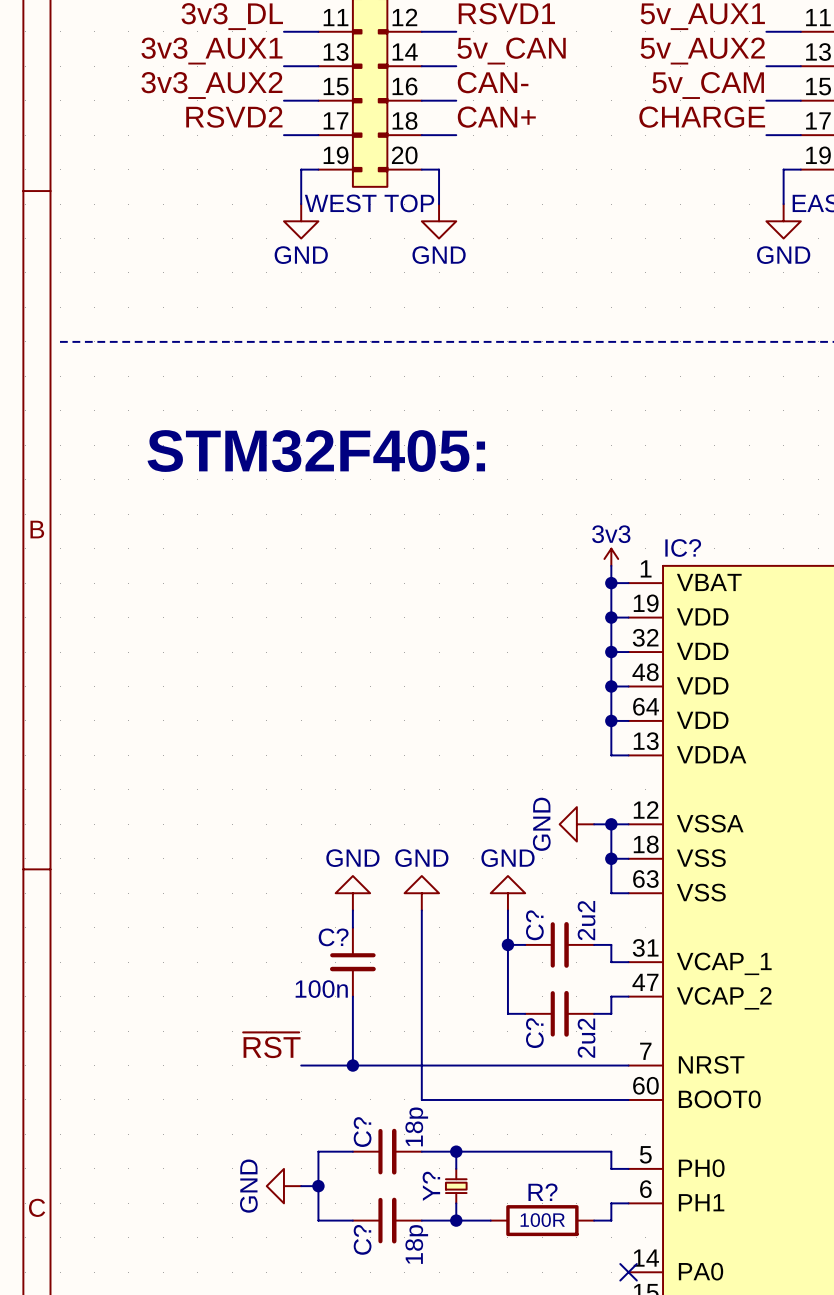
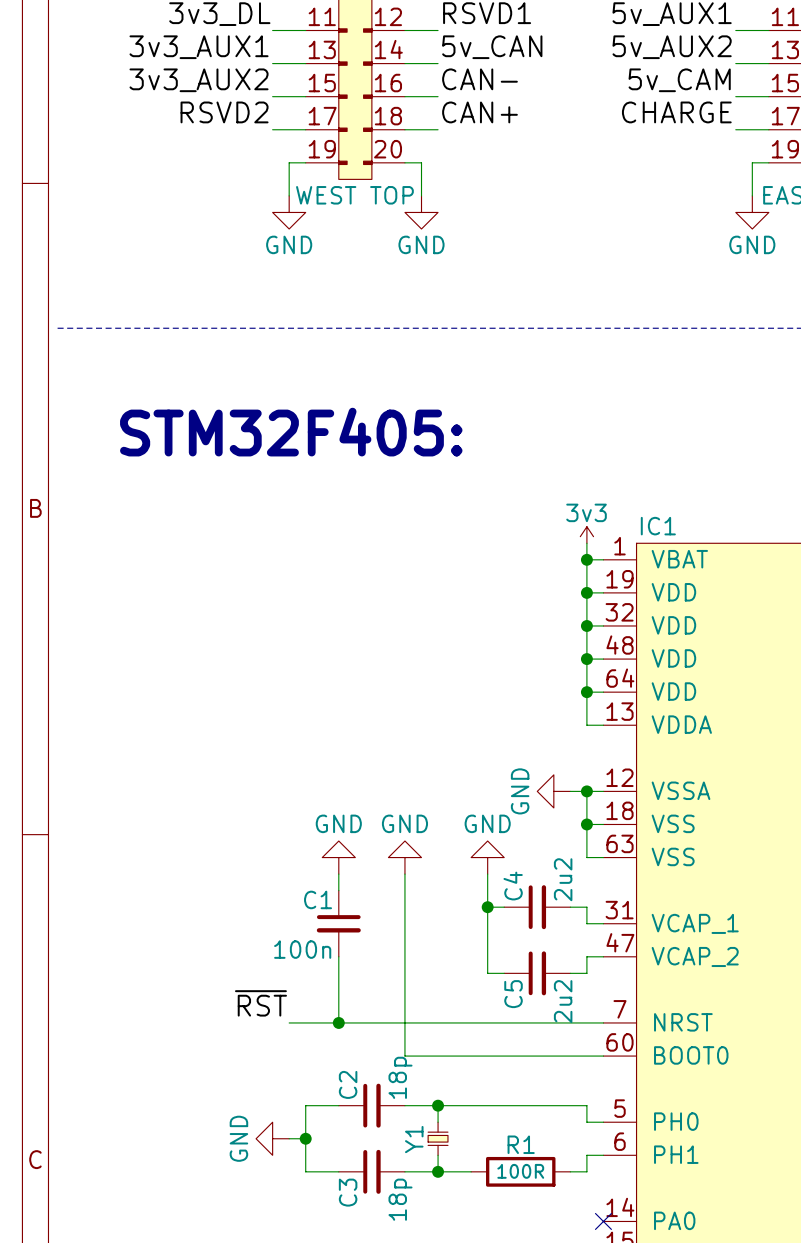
IC? name: IC? (683, 548) -> IC1 (658, 526)
C? name: C? (534, 925) -> C4 (513, 886)
C? name: C? (333, 937) -> C1 (318, 899)
C? name: C? (534, 1033) -> C5 (513, 994)
C? name: C? (362, 1132) -> C2 (348, 1084)
Y? name: Y? (431, 1186) -> Y1 (414, 1139)
R? name: R? (542, 1192) -> R1 (521, 1144)
C? name: C? (362, 1239) -> C3 (348, 1192)

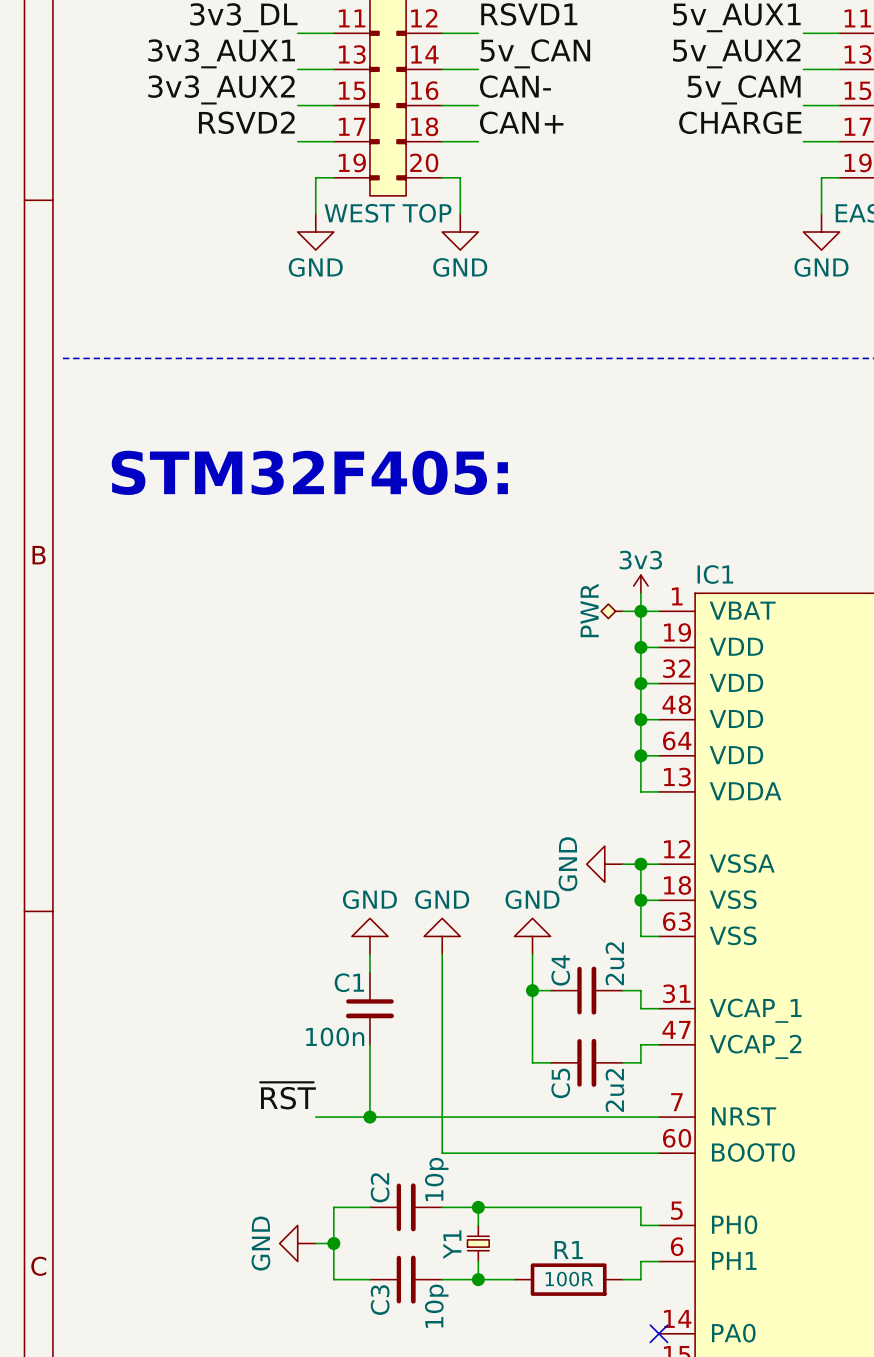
power symbol: none -> PWR (612, 611)
wire: none -> (622, 611) (640, 611)
C2 value: 18p (400, 1077) -> 10p (436, 1179)
C3 value: 18p (400, 1199) -> 10p (436, 1306)

